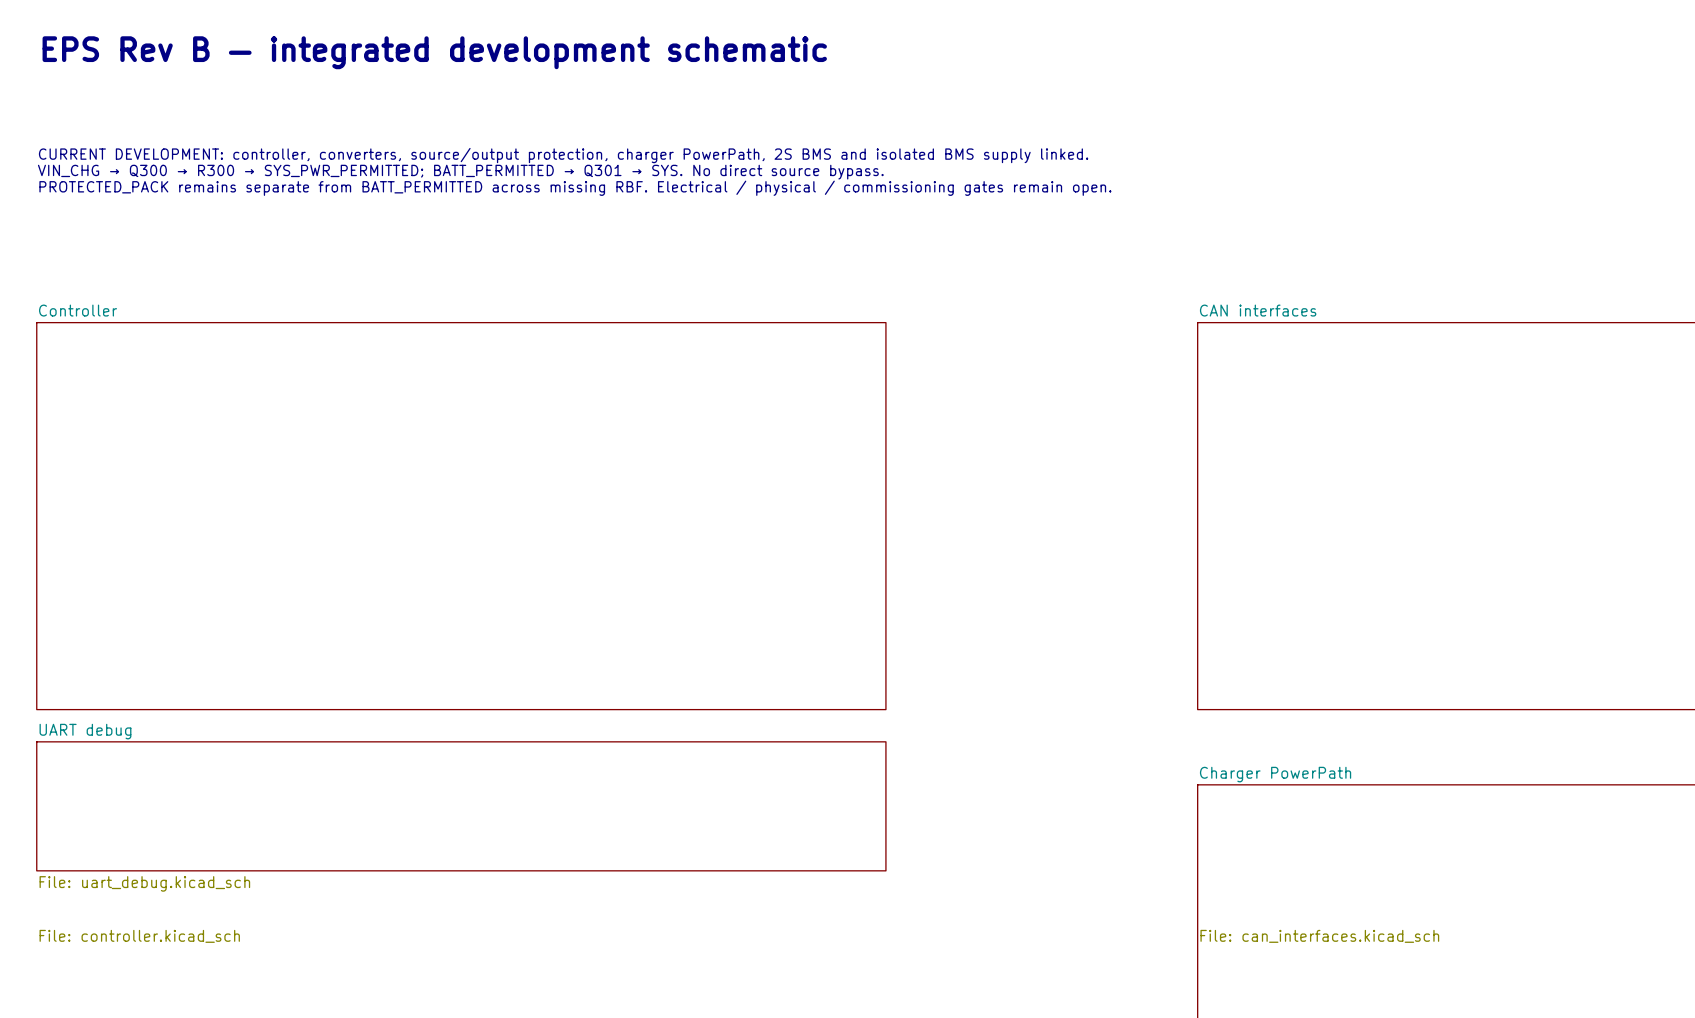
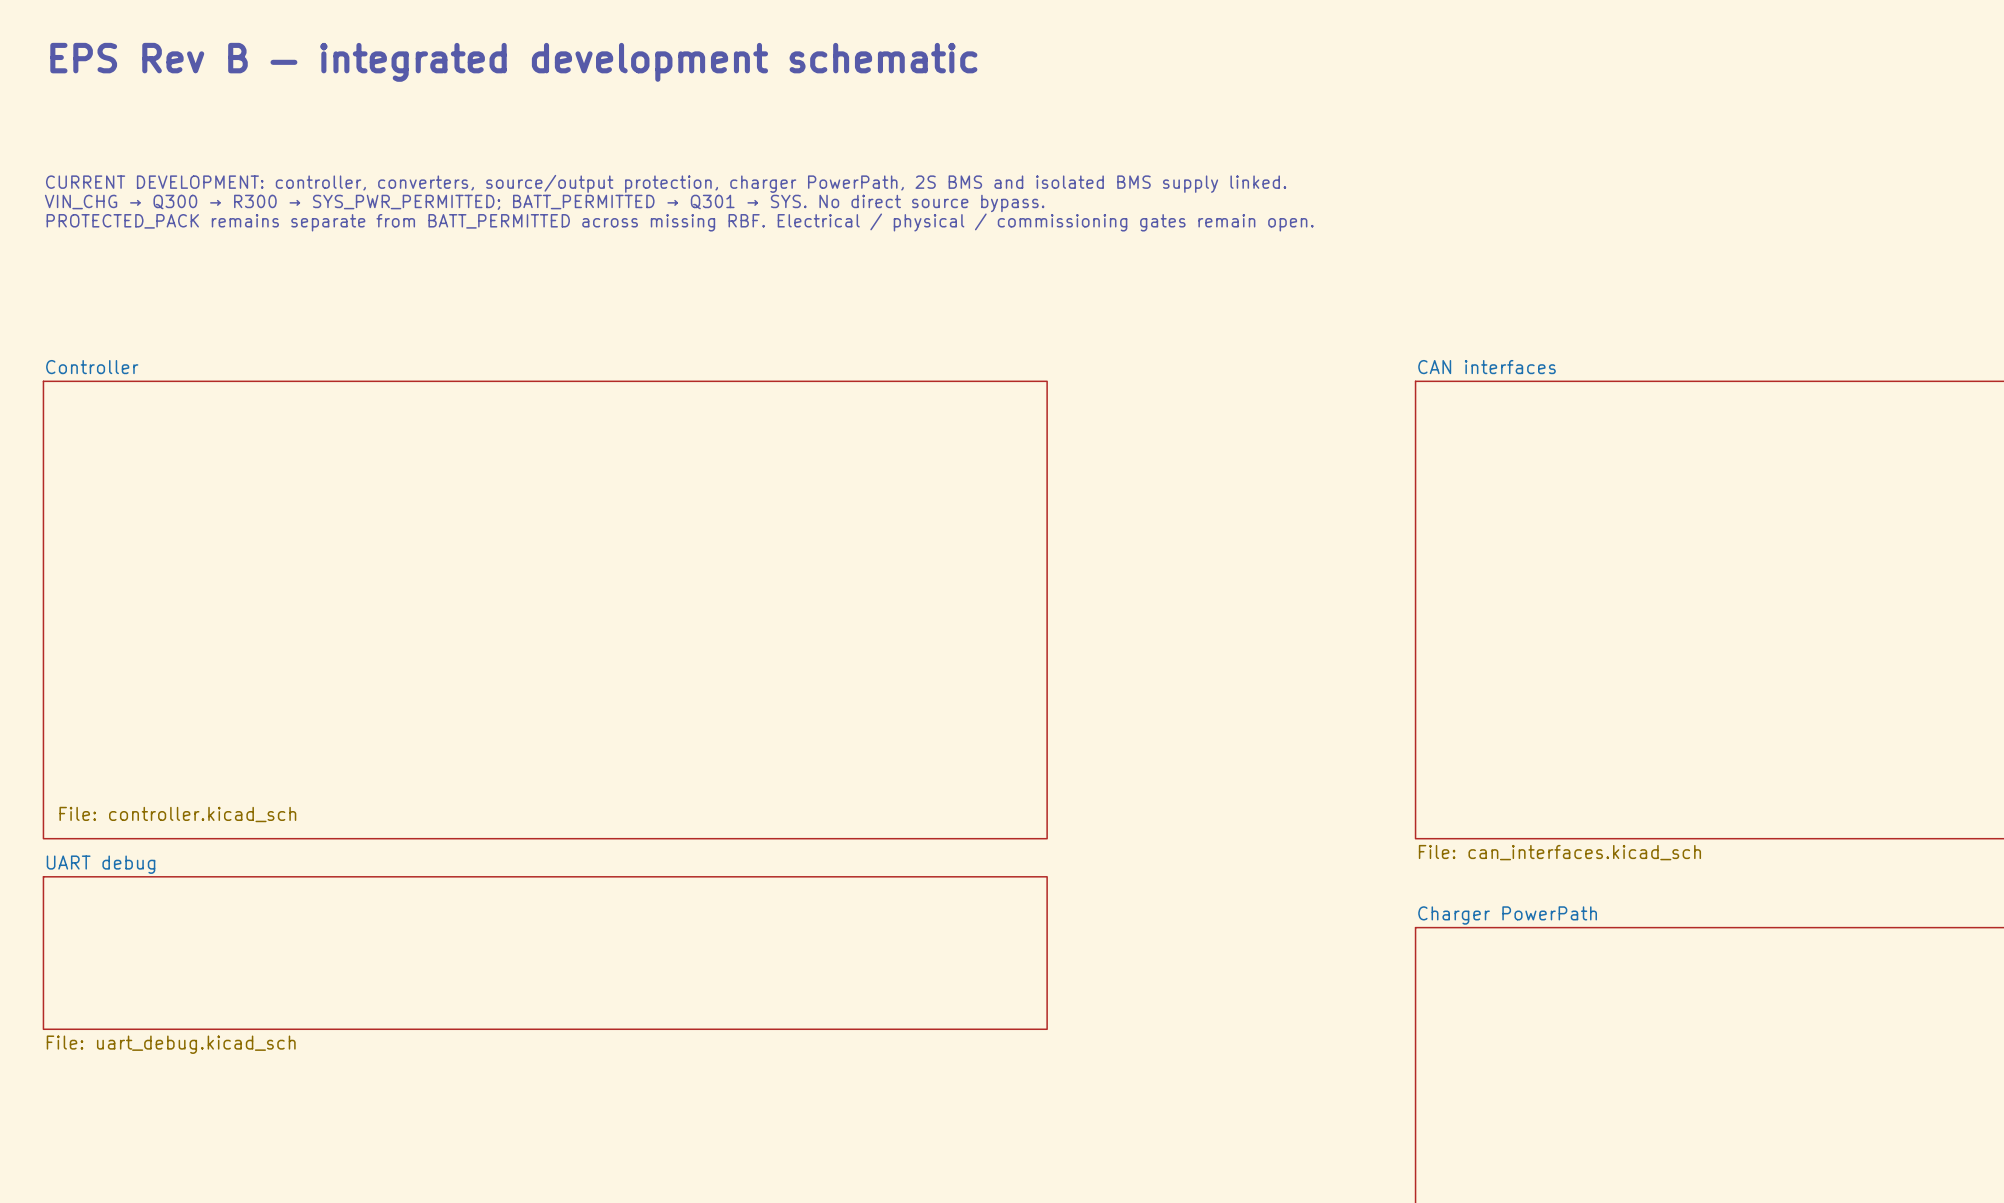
sheet Controller value position: File: controller.kicad_sch (139, 936) -> File: controller.kicad_sch (177, 814)
sheet CAN interfaces value position: File: can_interfaces.kicad_sch (1319, 936) -> File: can_interfaces.kicad_sch (1559, 852)

